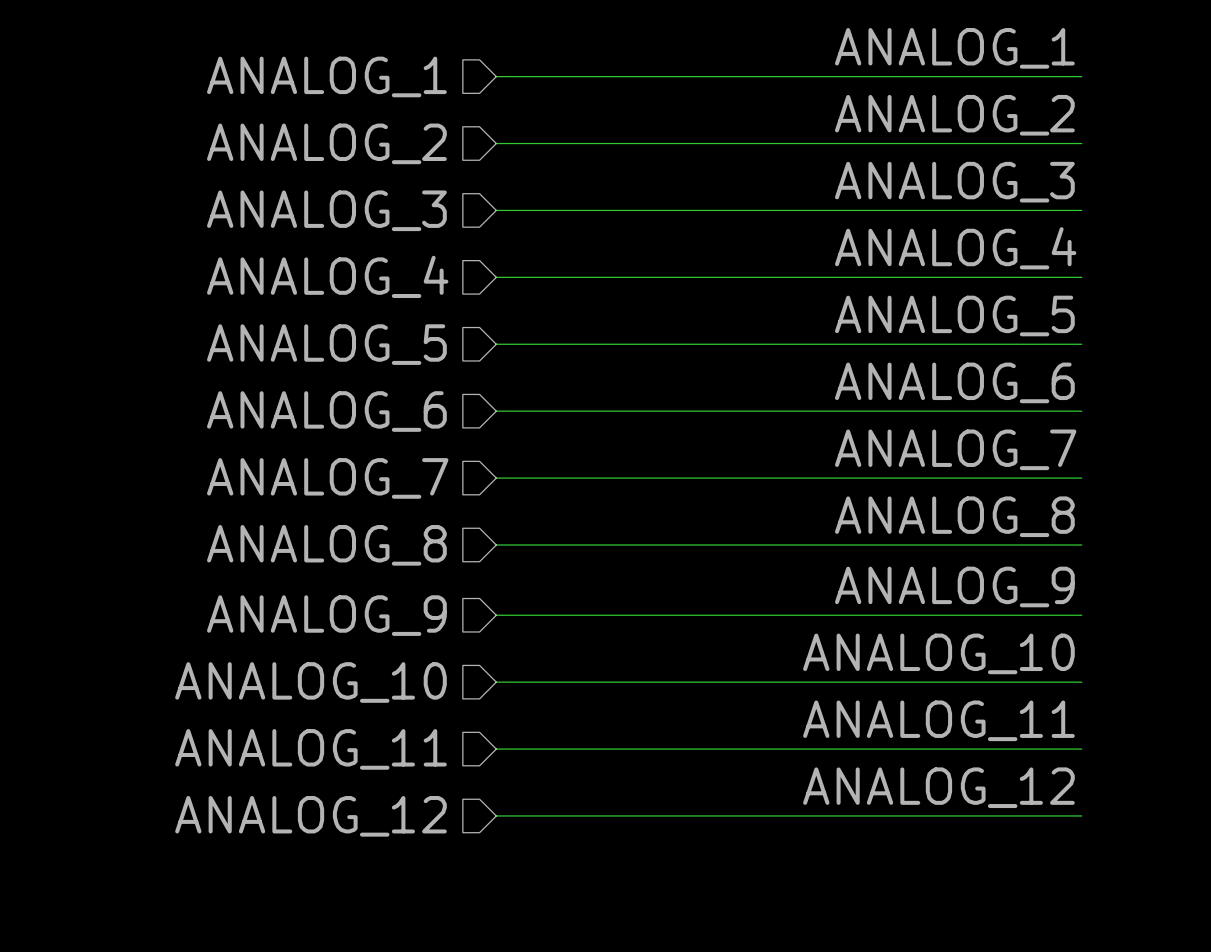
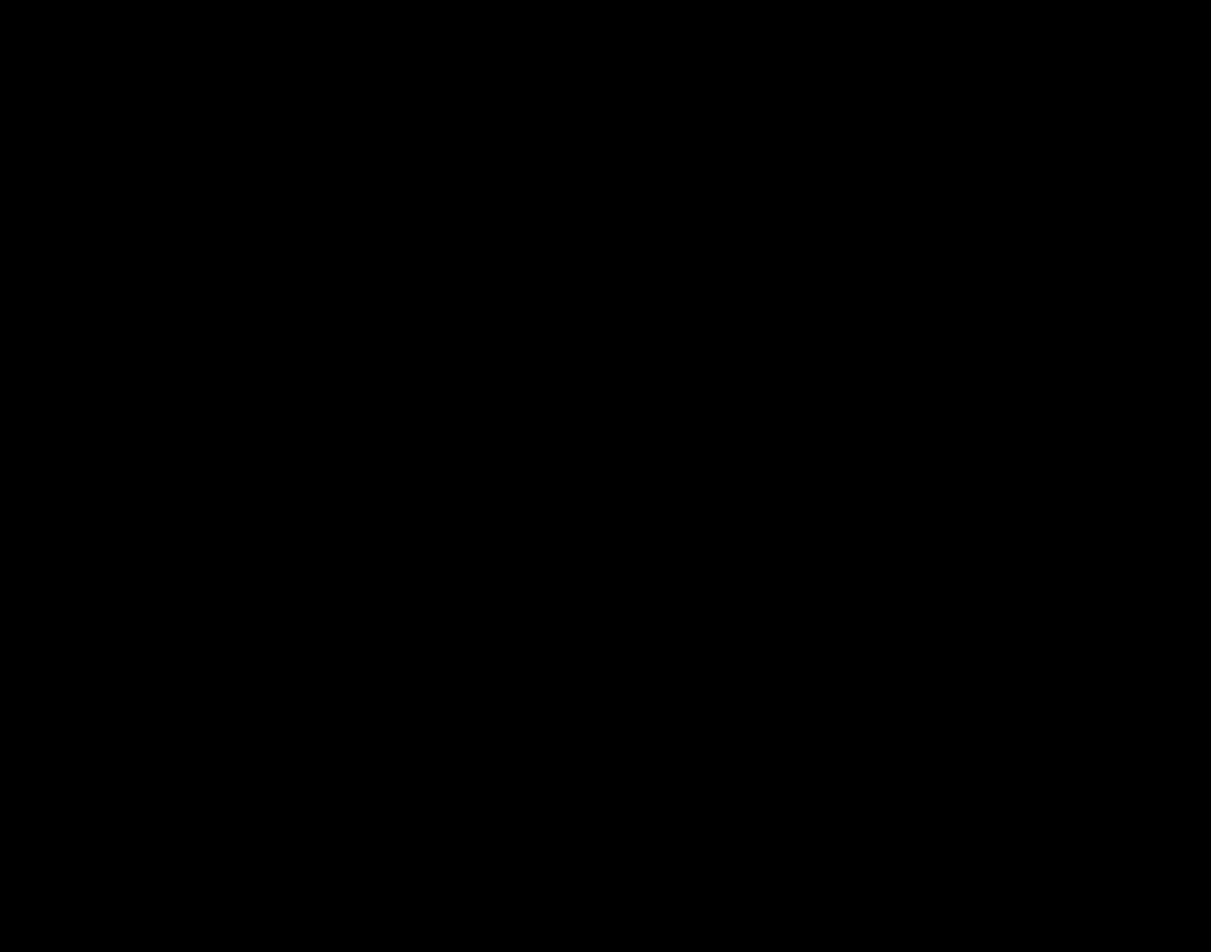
label: ANALOG_1 (954, 48) -> none
hierarchical label: ANALOG_1 (326, 76) -> none
wire: (496, 76) (1081, 76) -> none
label: ANALOG_2 (954, 115) -> none
hierarchical label: ANALOG_2 (326, 143) -> none
wire: (496, 143) (1081, 143) -> none
label: ANALOG_3 (954, 182) -> none
hierarchical label: ANALOG_3 (326, 210) -> none
wire: (496, 210) (1081, 210) -> none
label: ANALOG_4 (955, 248) -> none
hierarchical label: ANALOG_4 (327, 276) -> none
wire: (496, 277) (1081, 277) -> none
label: ANALOG_5 (954, 315) -> none
hierarchical label: ANALOG_5 (326, 344) -> none
wire: (496, 344) (1081, 344) -> none
label: ANALOG_6 (954, 382) -> none
hierarchical label: ANALOG_6 (326, 411) -> none
wire: (496, 411) (1081, 411) -> none
label: ANALOG_7 (955, 449) -> none
hierarchical label: ANALOG_7 (327, 478) -> none
wire: (496, 478) (1081, 478) -> none
label: ANALOG_8 (954, 516) -> none
wire: (496, 544) (1081, 544) -> none
hierarchical label: ANALOG_8 (326, 545) -> none
label: ANALOG_9 (954, 586) -> none
hierarchical label: ANALOG_9 (326, 615) -> none
wire: (496, 615) (1081, 615) -> none
label: ANALOG_10 (938, 653) -> none
hierarchical label: ANALOG_10 (310, 682) -> none
wire: (496, 682) (1081, 682) -> none
label: ANALOG_11 (938, 720) -> none
hierarchical label: ANALOG_11 (310, 749) -> none
wire: (496, 749) (1081, 749) -> none
label: ANALOG_12 (938, 787) -> none
wire: (496, 815) (1081, 815) -> none
hierarchical label: ANALOG_12 (310, 816) -> none

